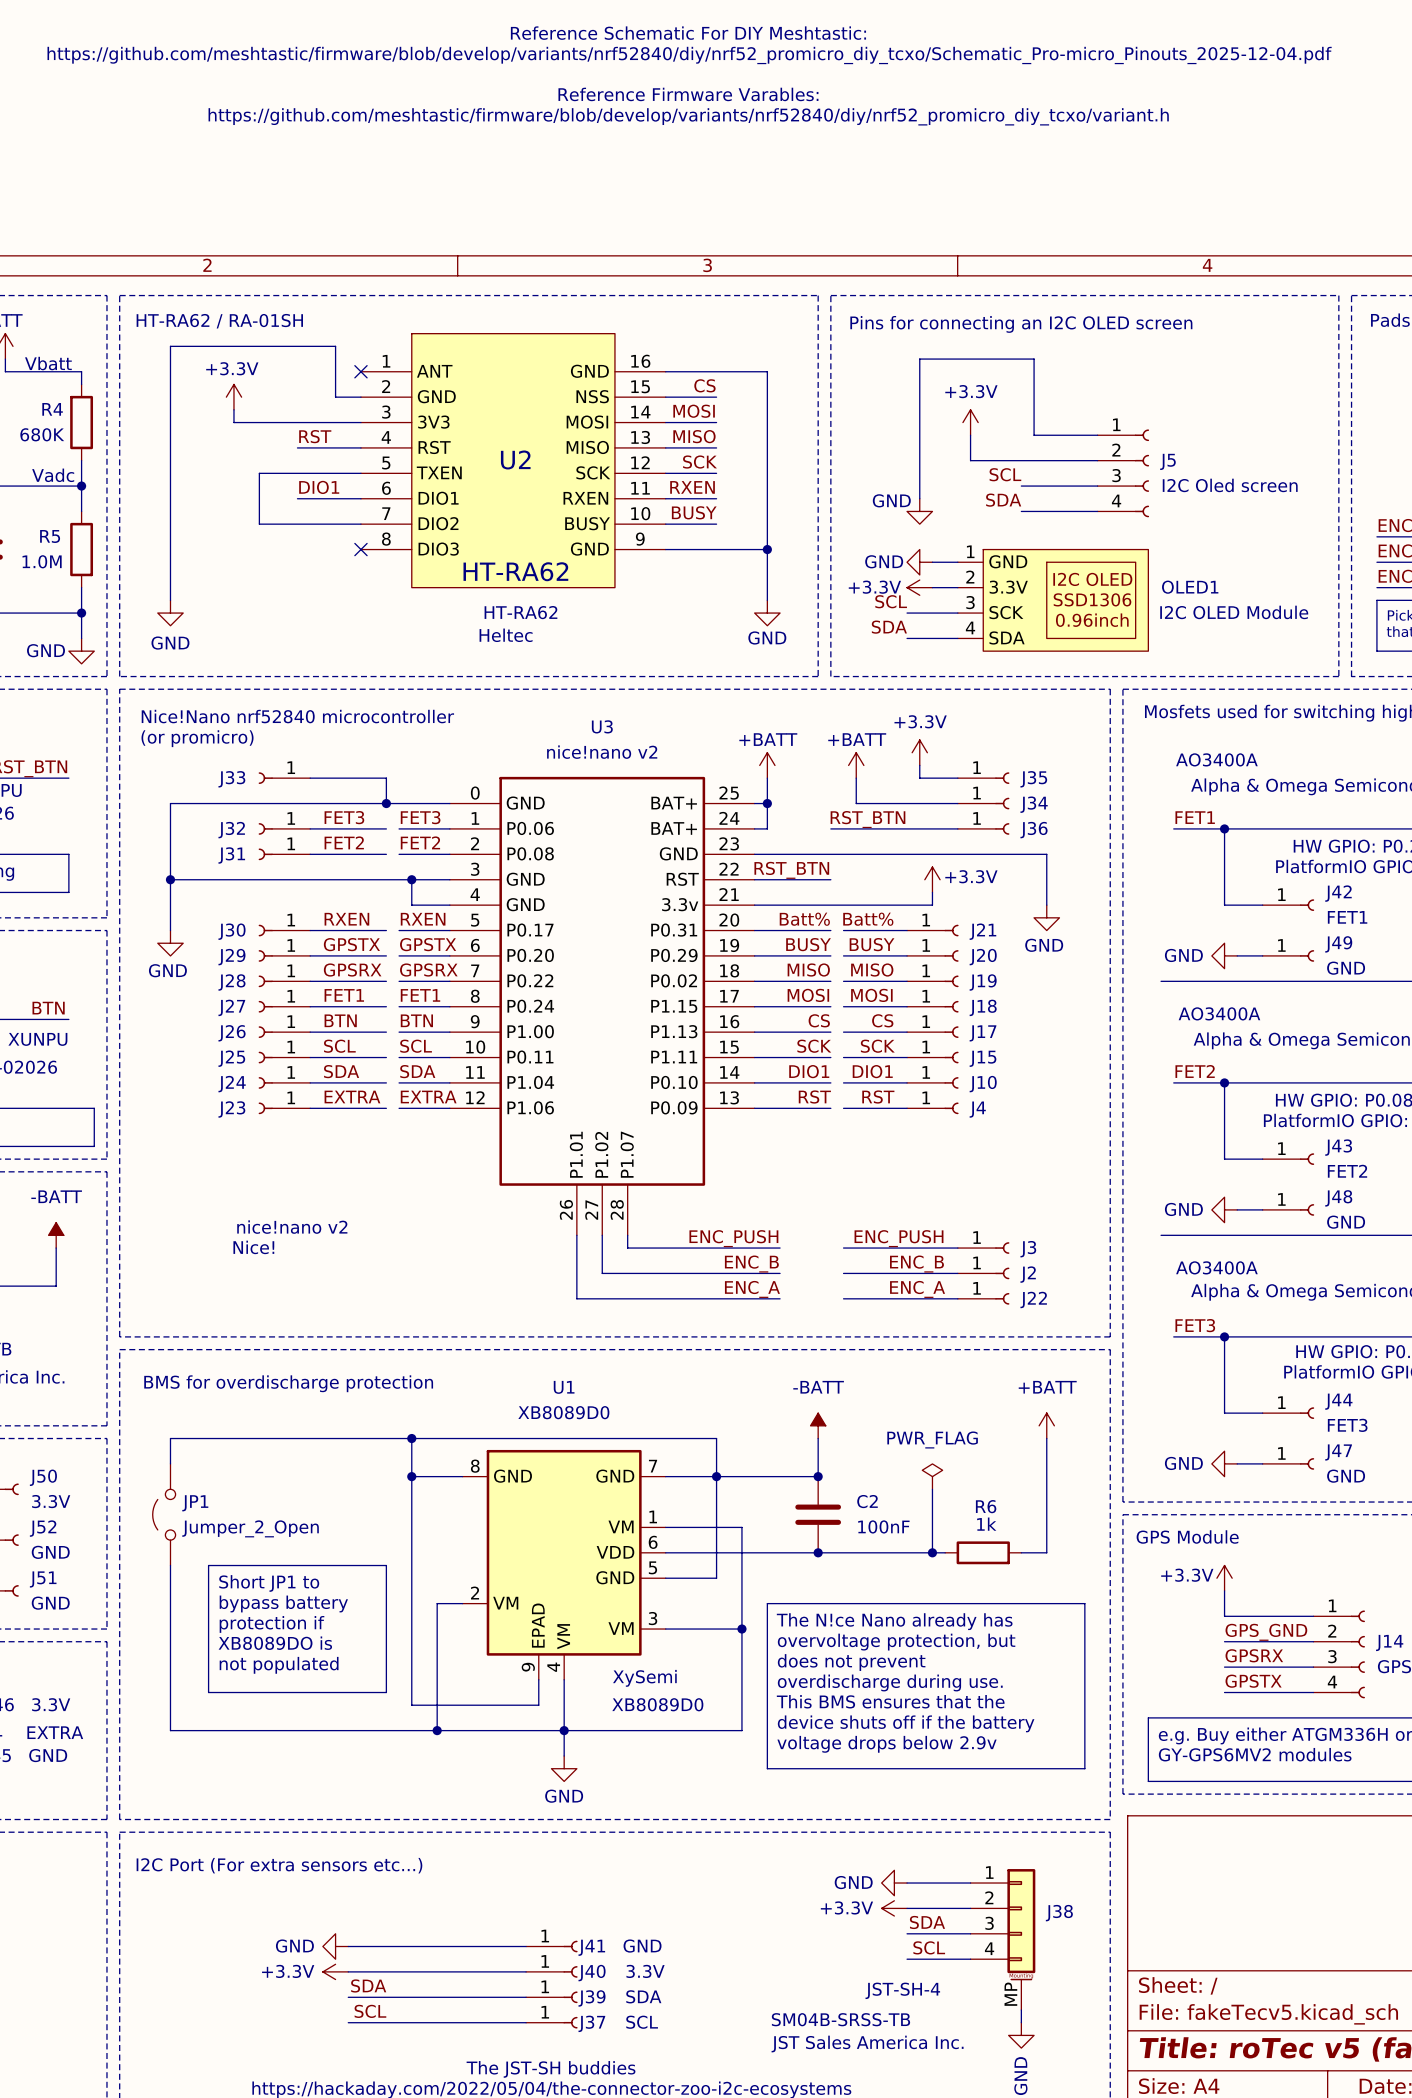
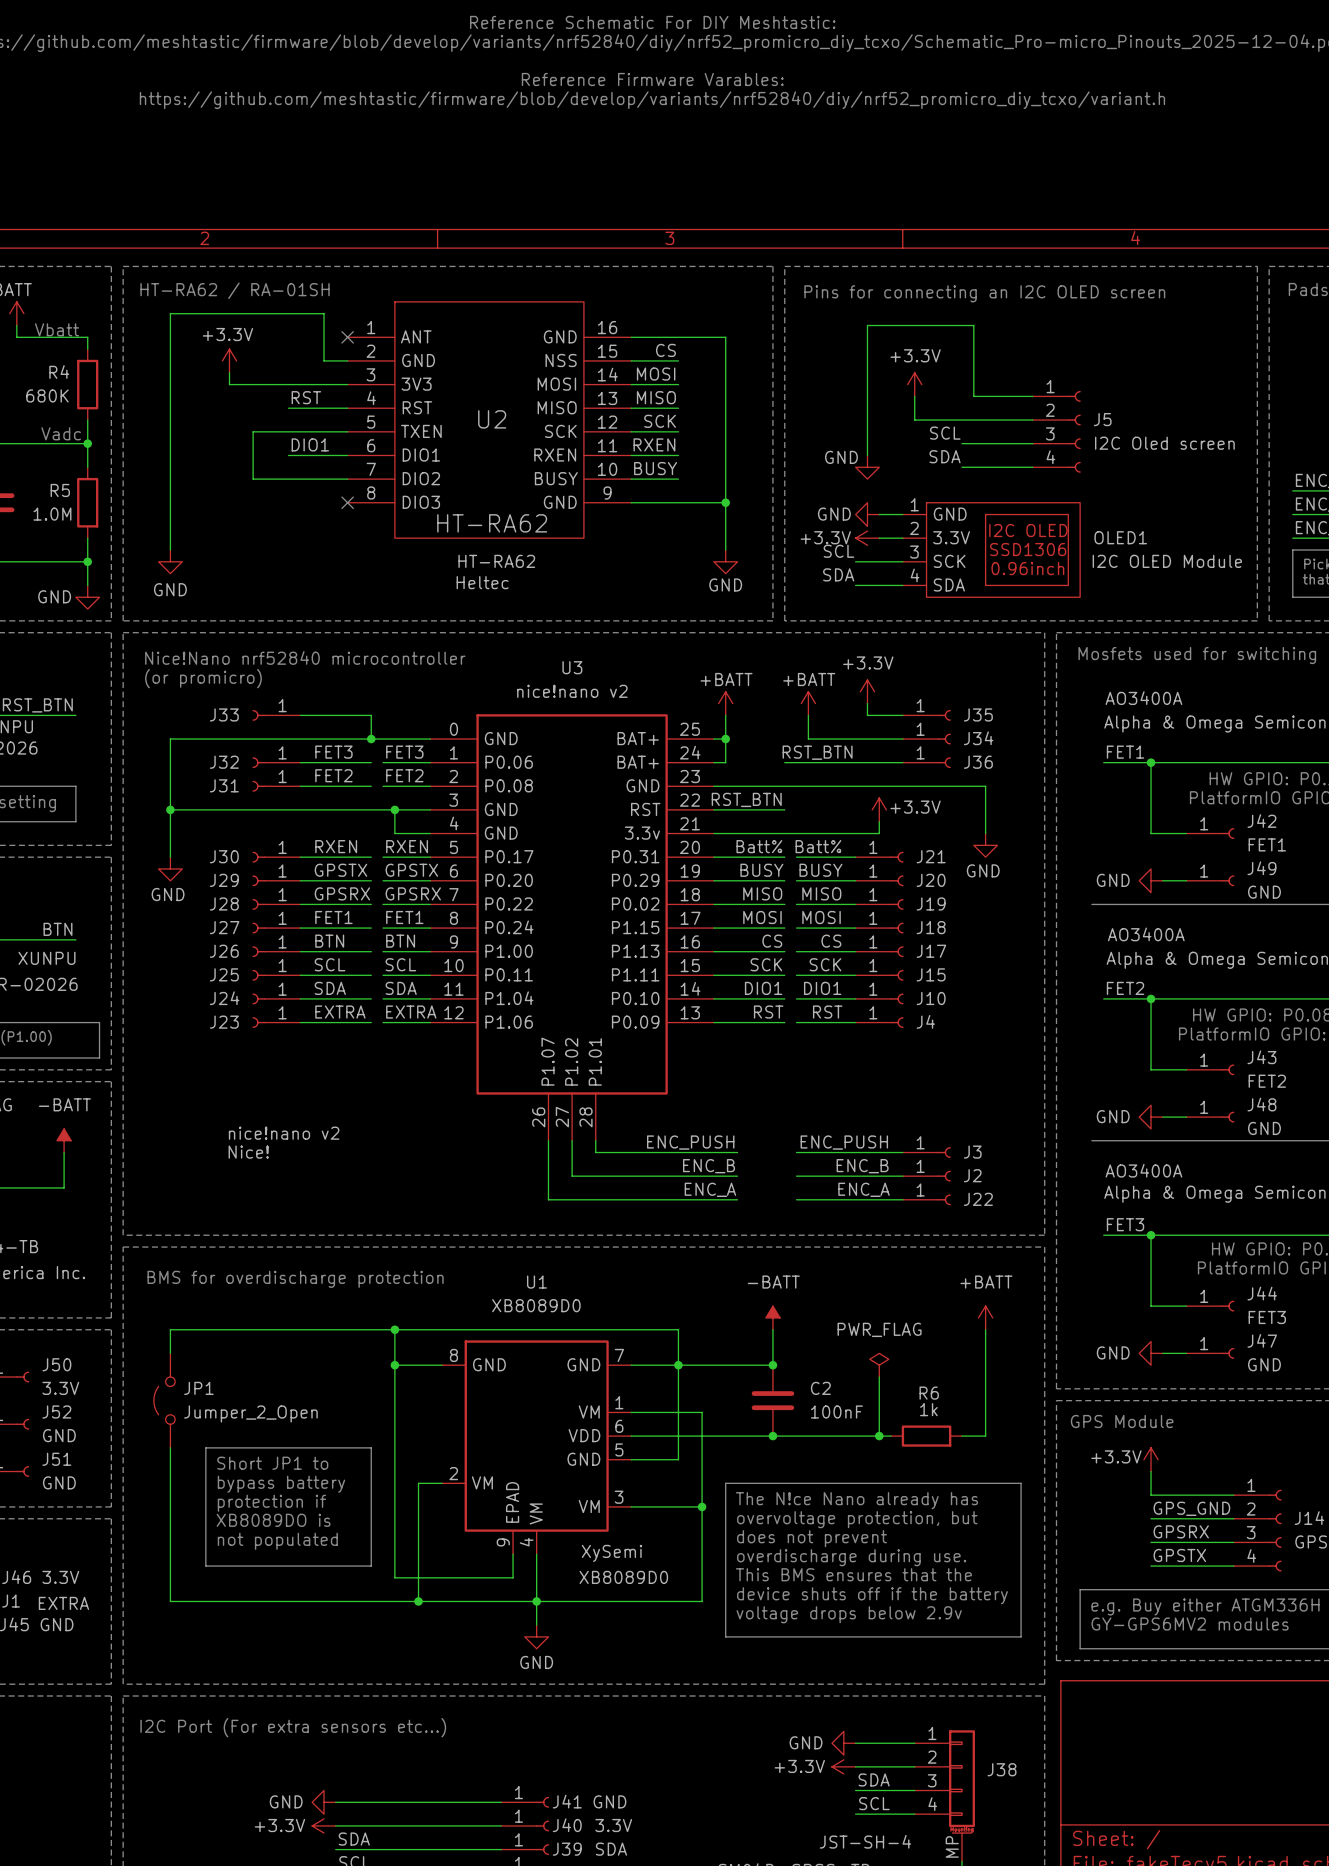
U3 pin name: P1.01 (576, 1154) -> P1.07 (548, 1061)
U3 pin name: P1.07 (627, 1154) -> P1.01 (595, 1061)

